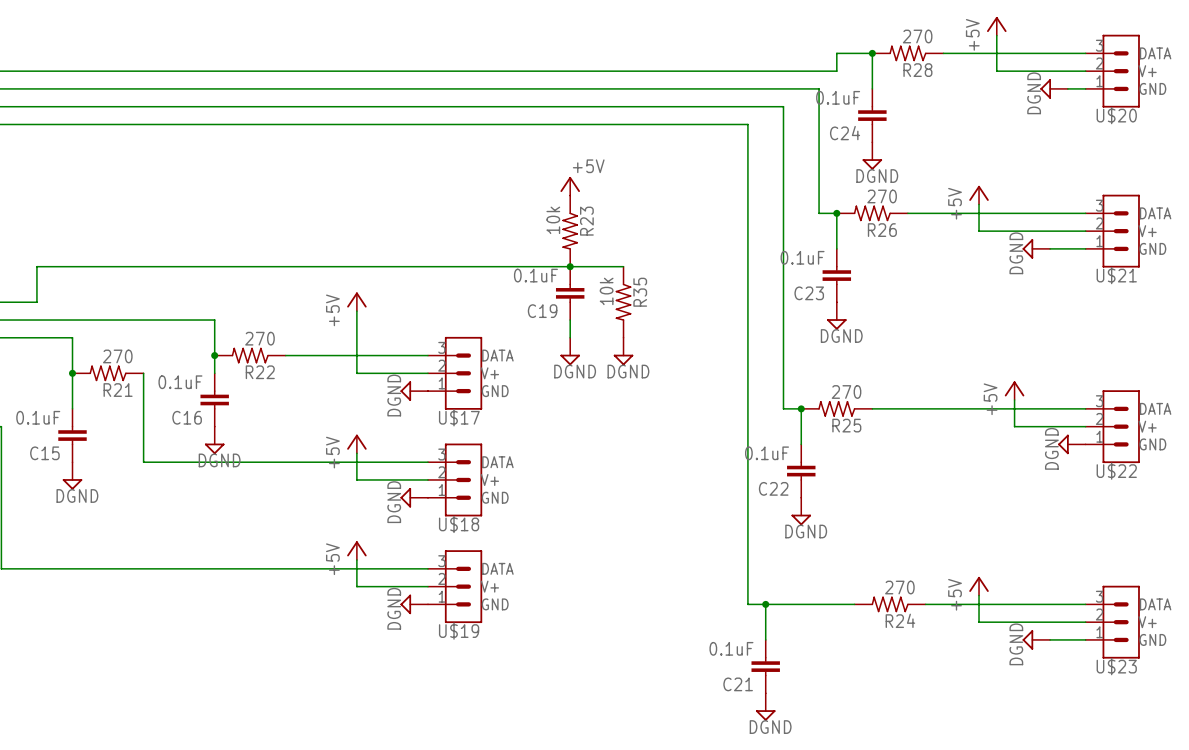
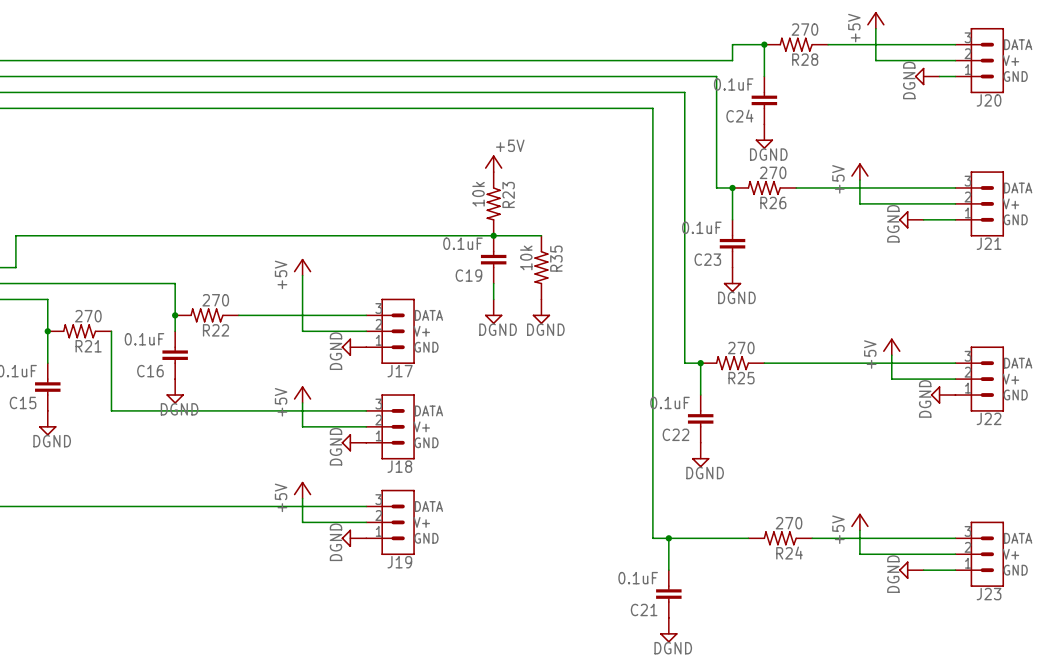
U$20 name: U$20 (1116, 115) -> J20 (989, 100)
U$21 name: U$21 (1116, 275) -> J21 (989, 243)
U$17 name: U$17 (459, 417) -> J17 (400, 371)
U$22 name: U$22 (1116, 471) -> J22 (989, 418)
U$18 name: U$18 (459, 524) -> J18 (399, 466)
U$19 name: U$19 (459, 631) -> J19 (399, 562)
U$23 name: U$23 (1116, 666) -> J23 (989, 594)

